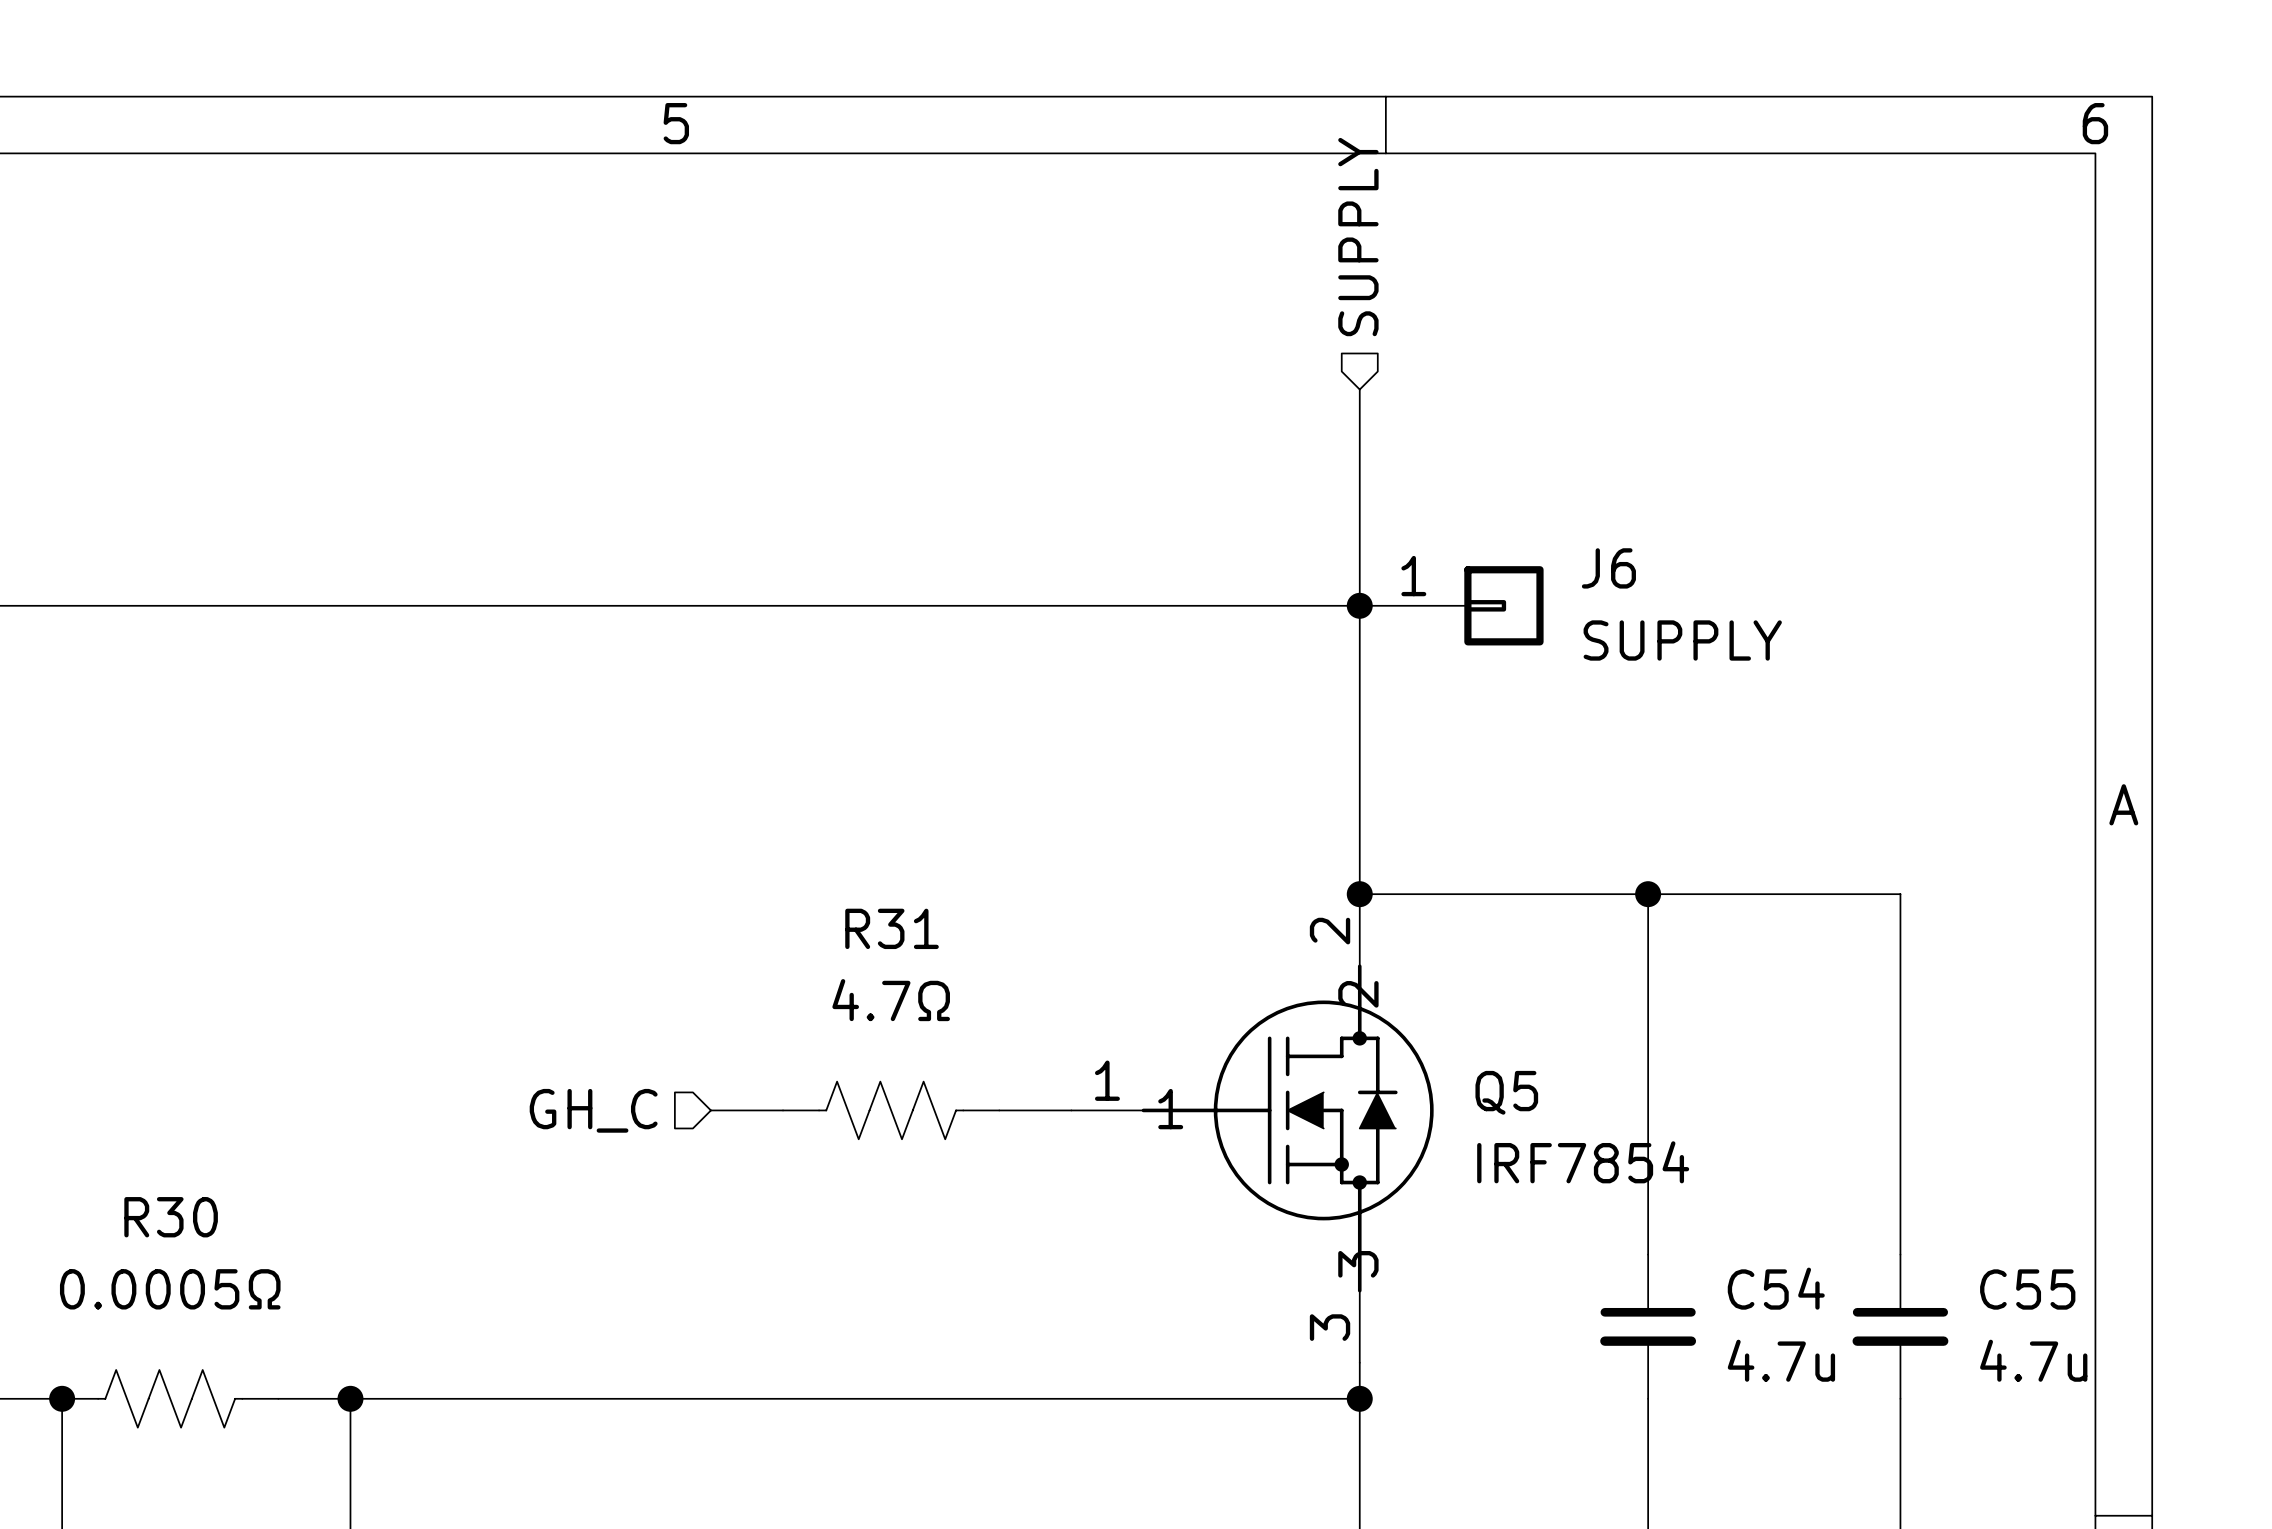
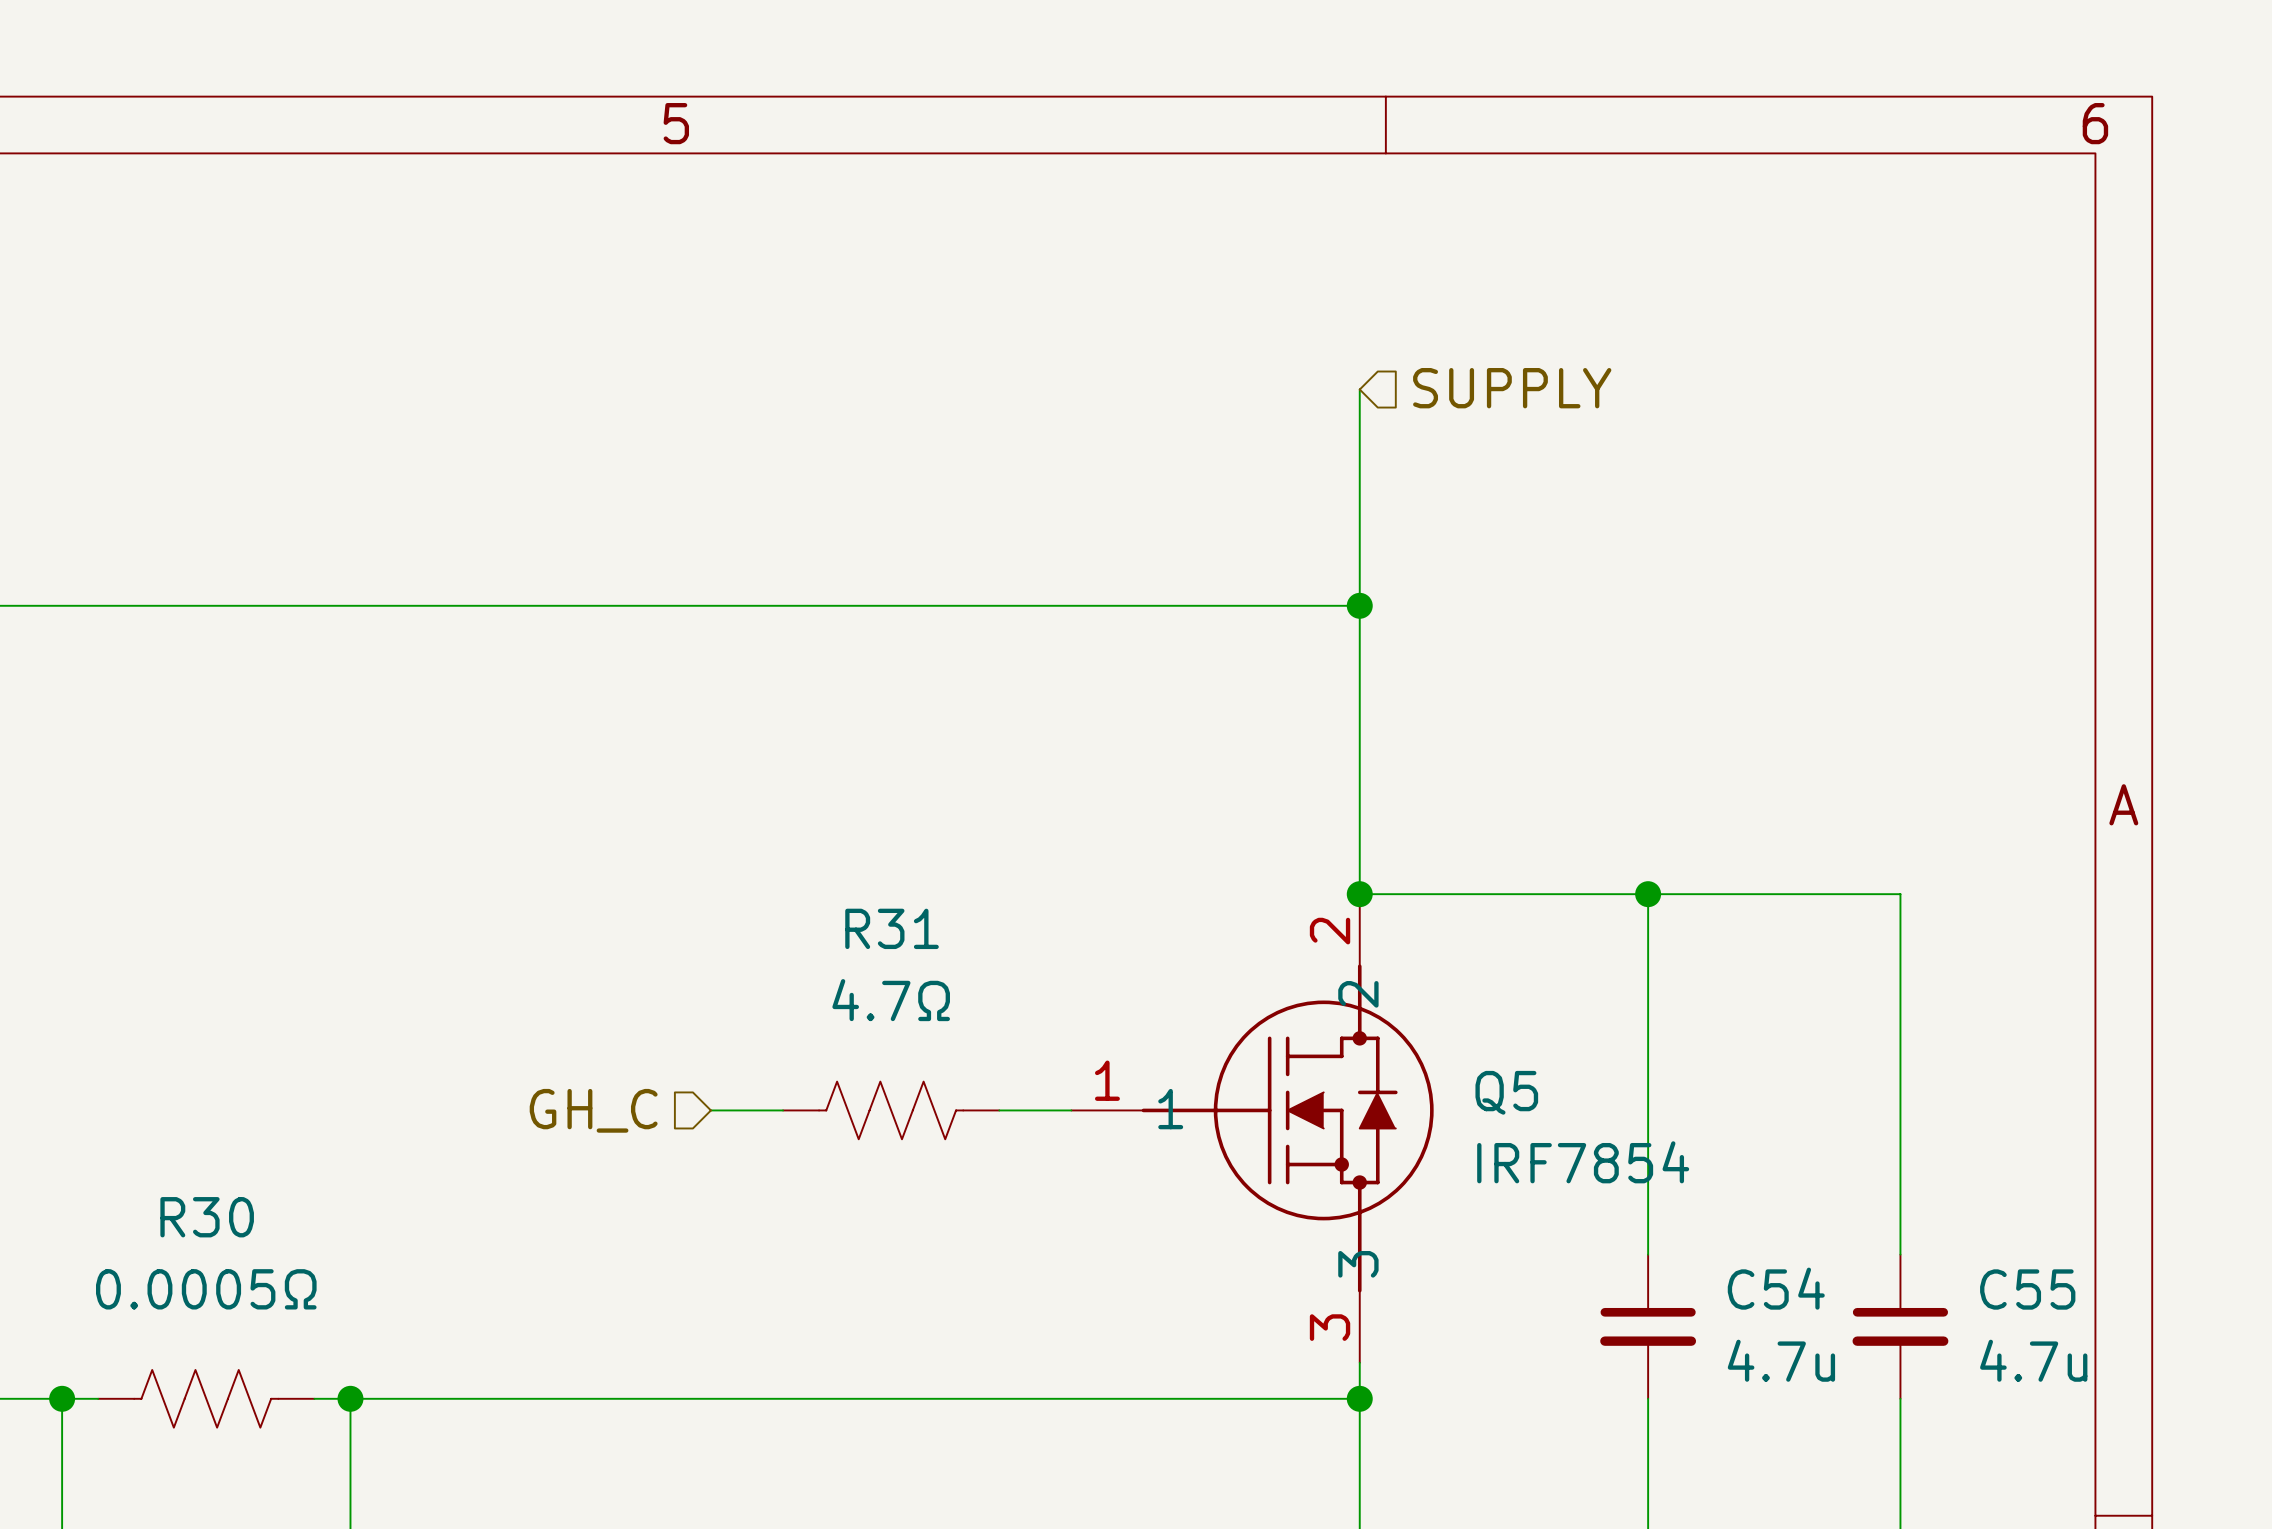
hierarchical label rotation: 0° (1358, 237) -> 90° clockwise (1512, 388)
J6: SUPPLY (1451, 605) -> none
R30 position: (170, 1398) -> (206, 1398)

